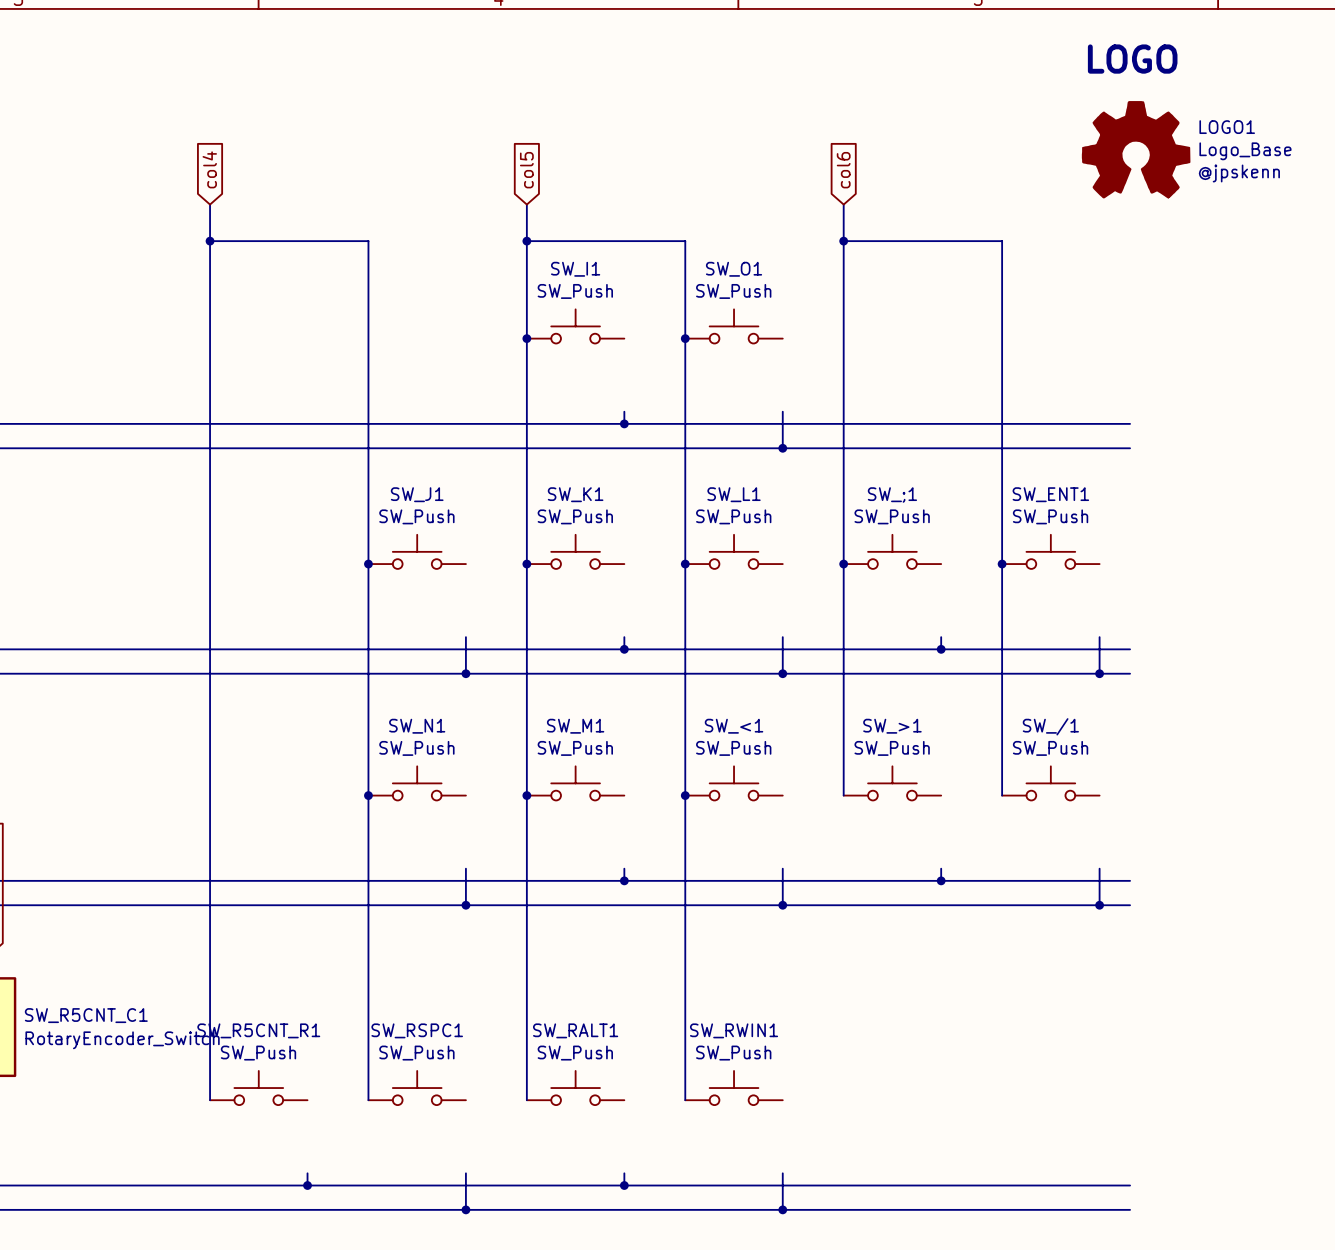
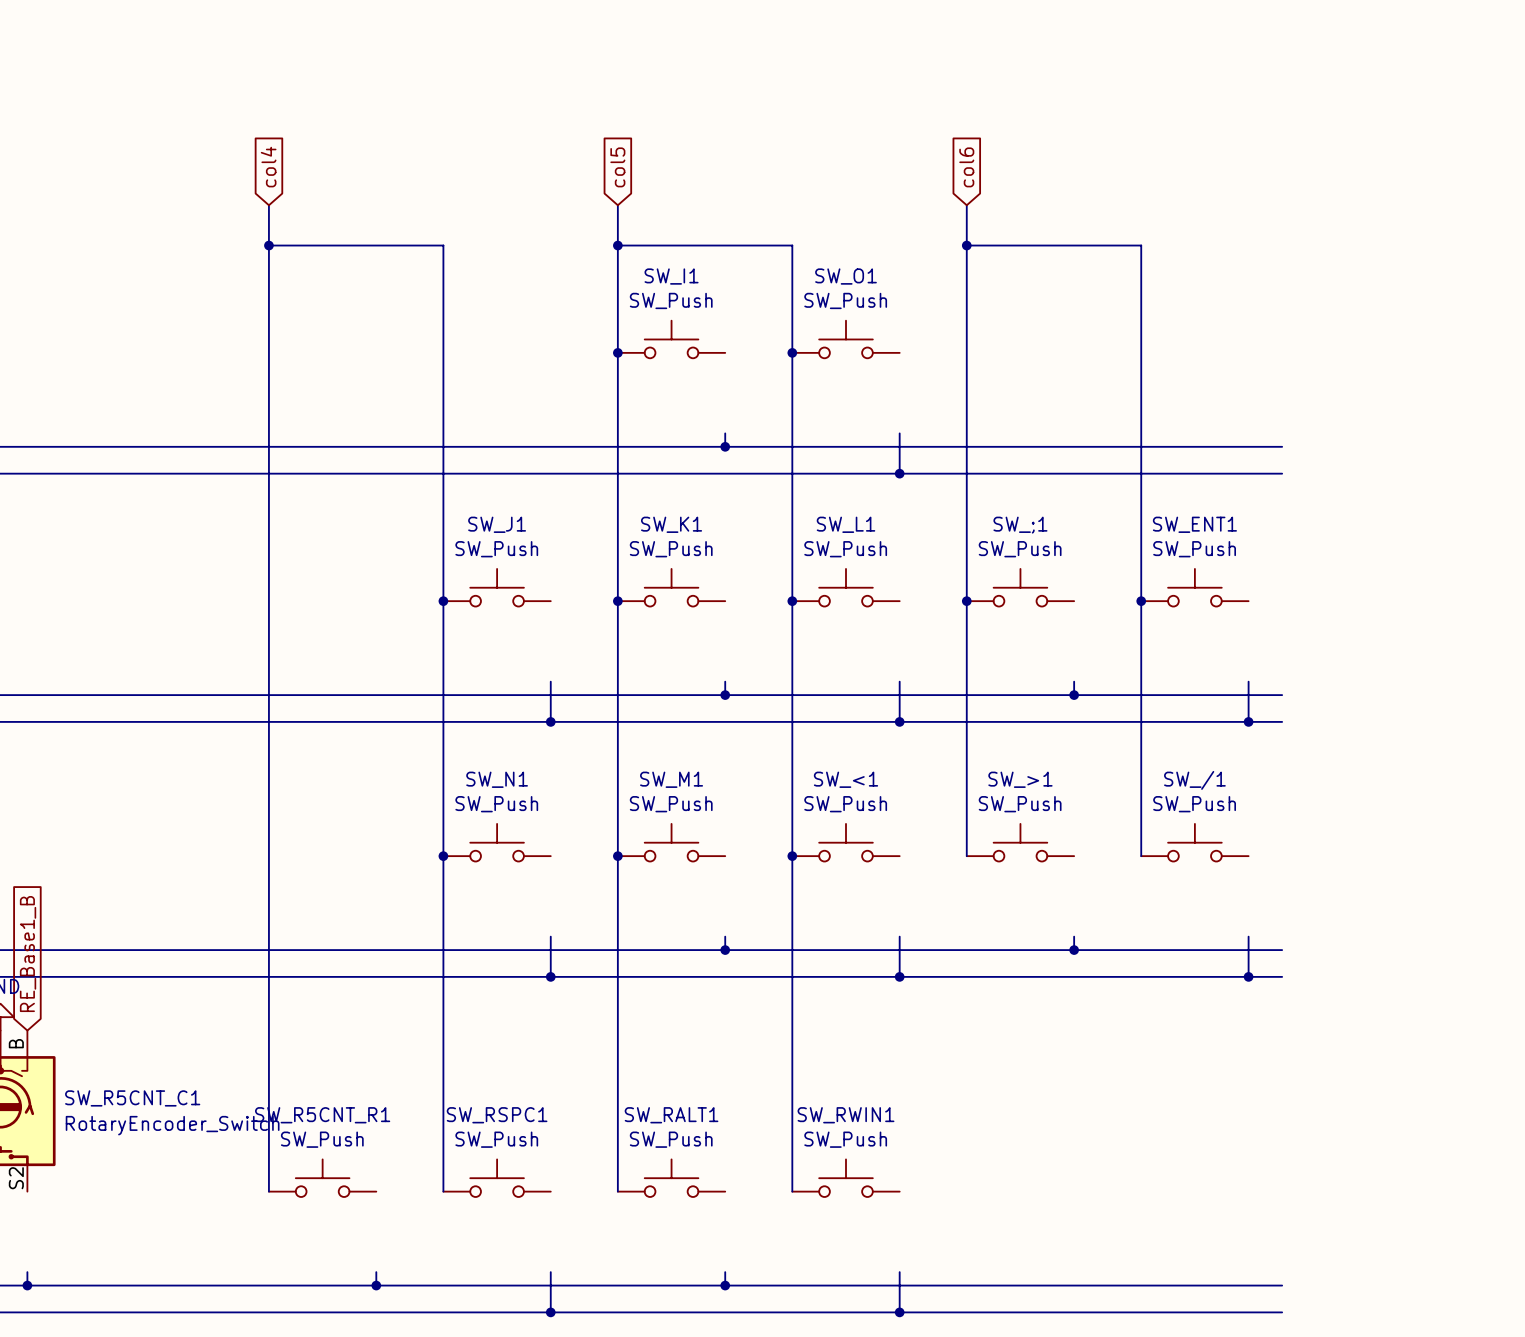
text: LOGO (1132, 59) -> none
LOGO1: Logo_Base (1136, 149) -> none

